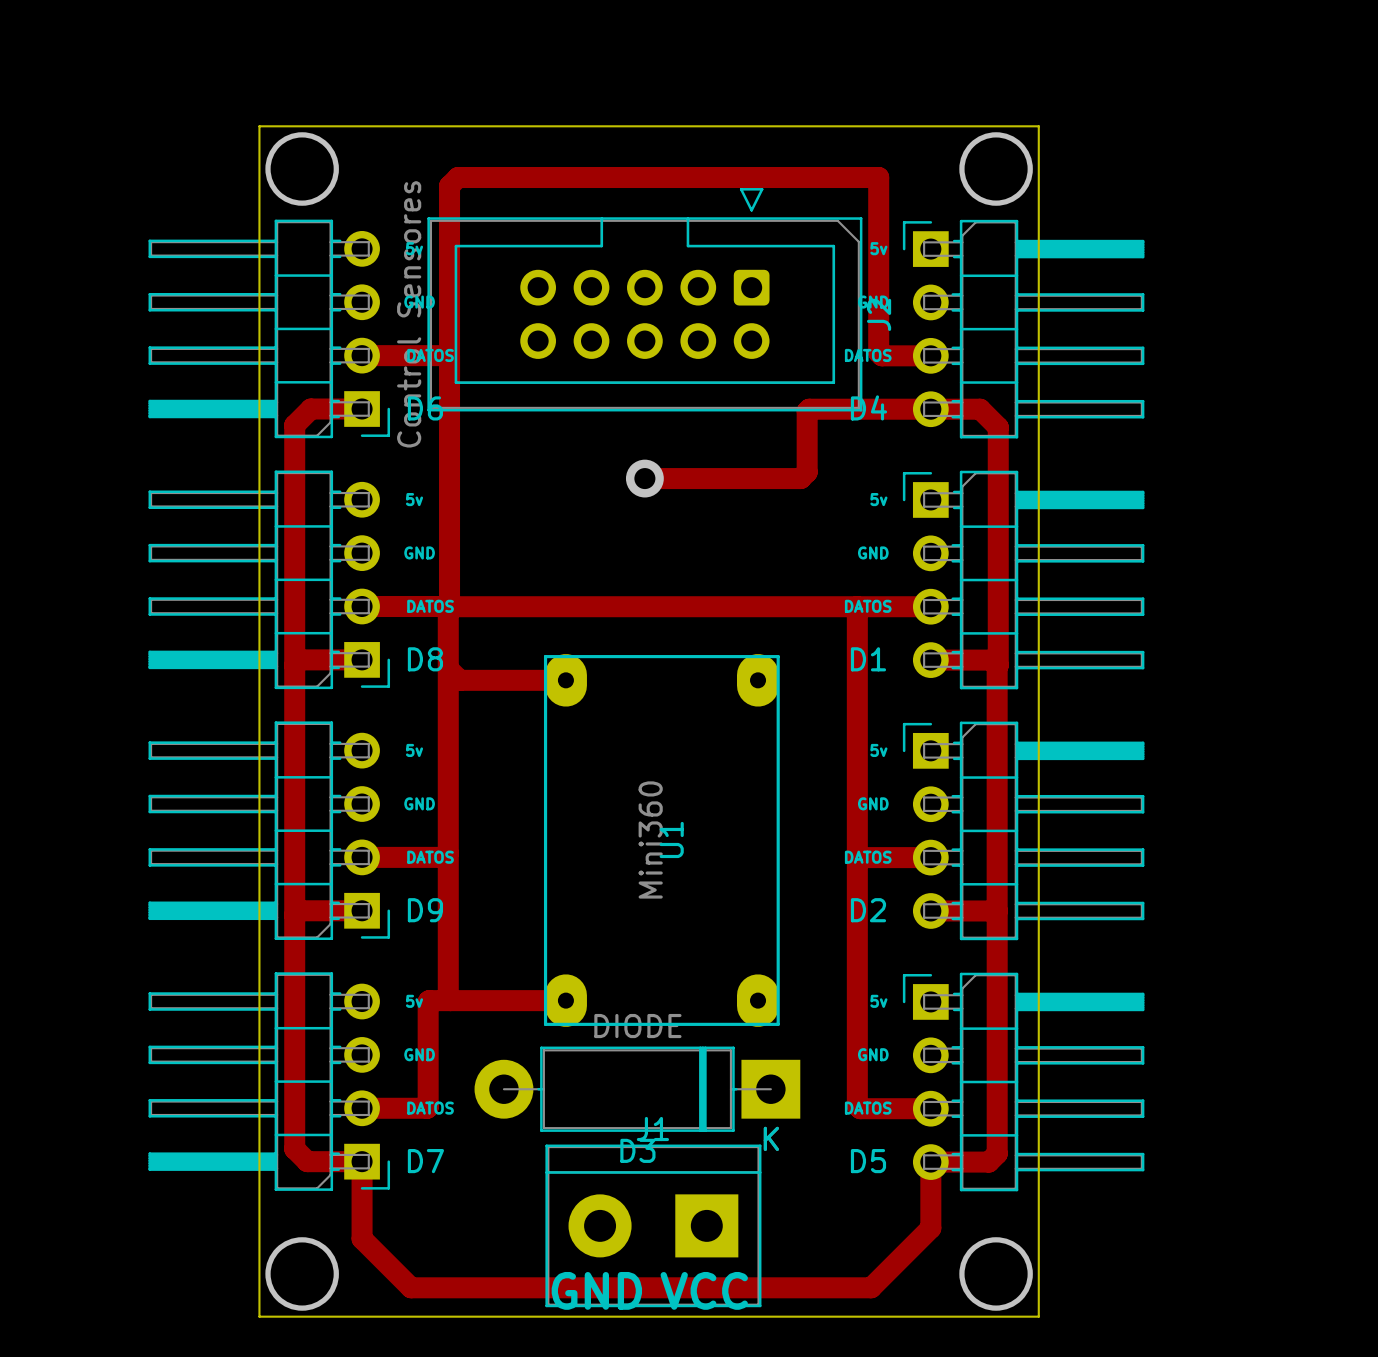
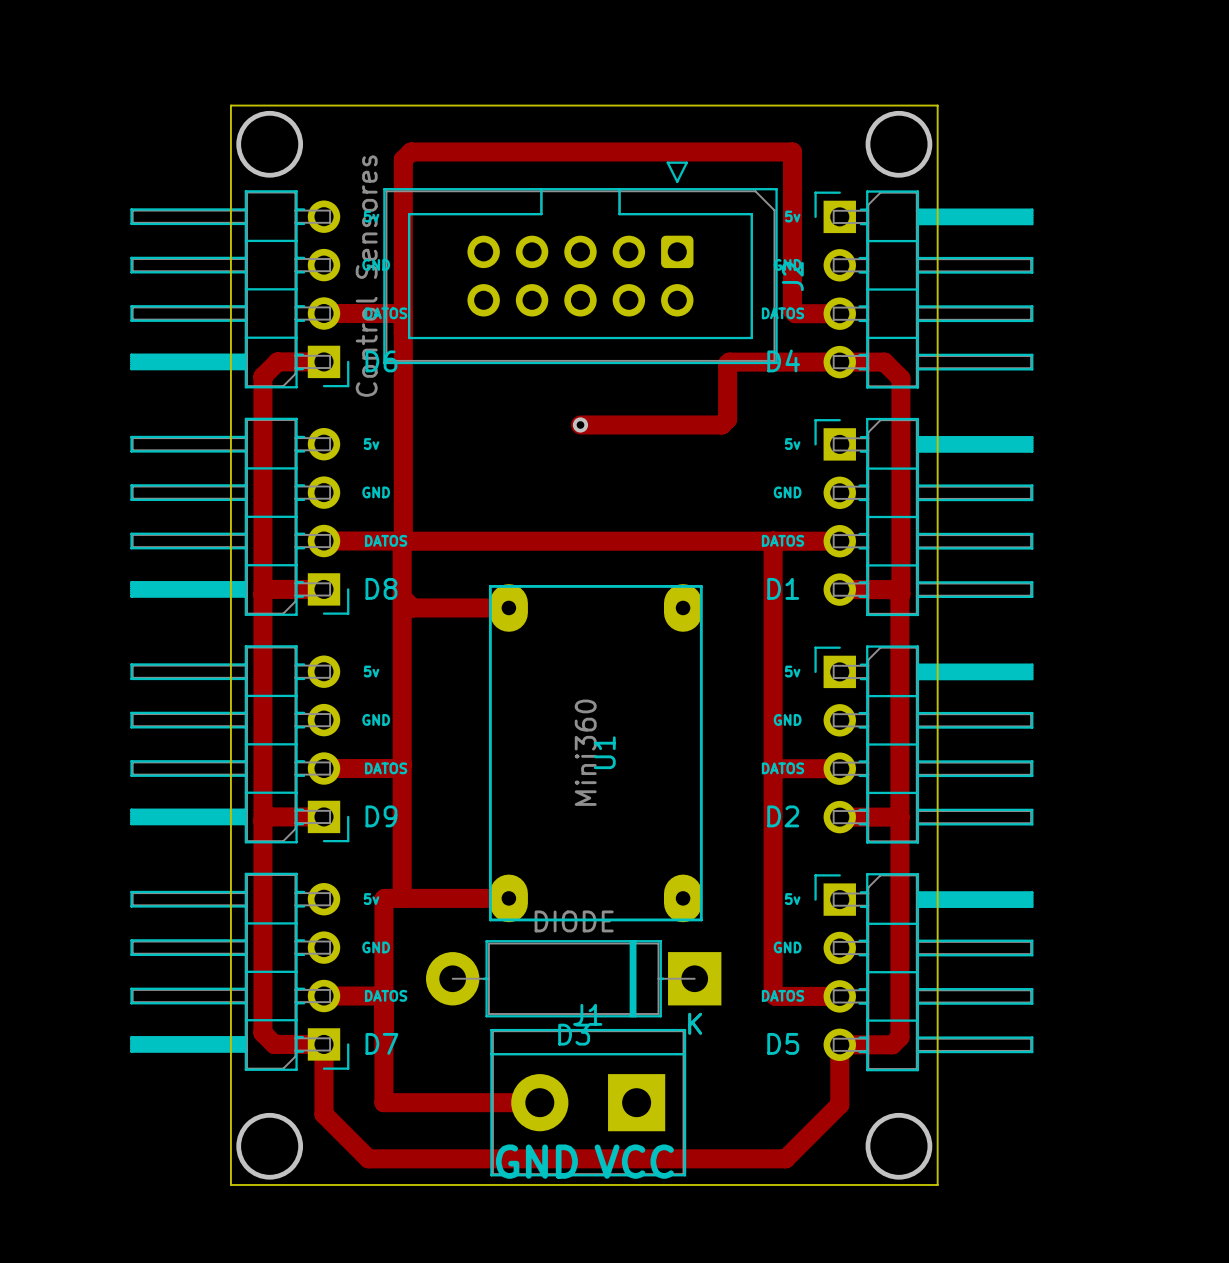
via size: [625, 459, 664, 498] -> [572, 417, 589, 433]
track: none -> (383, 995) (383, 1102) (539, 1102)

